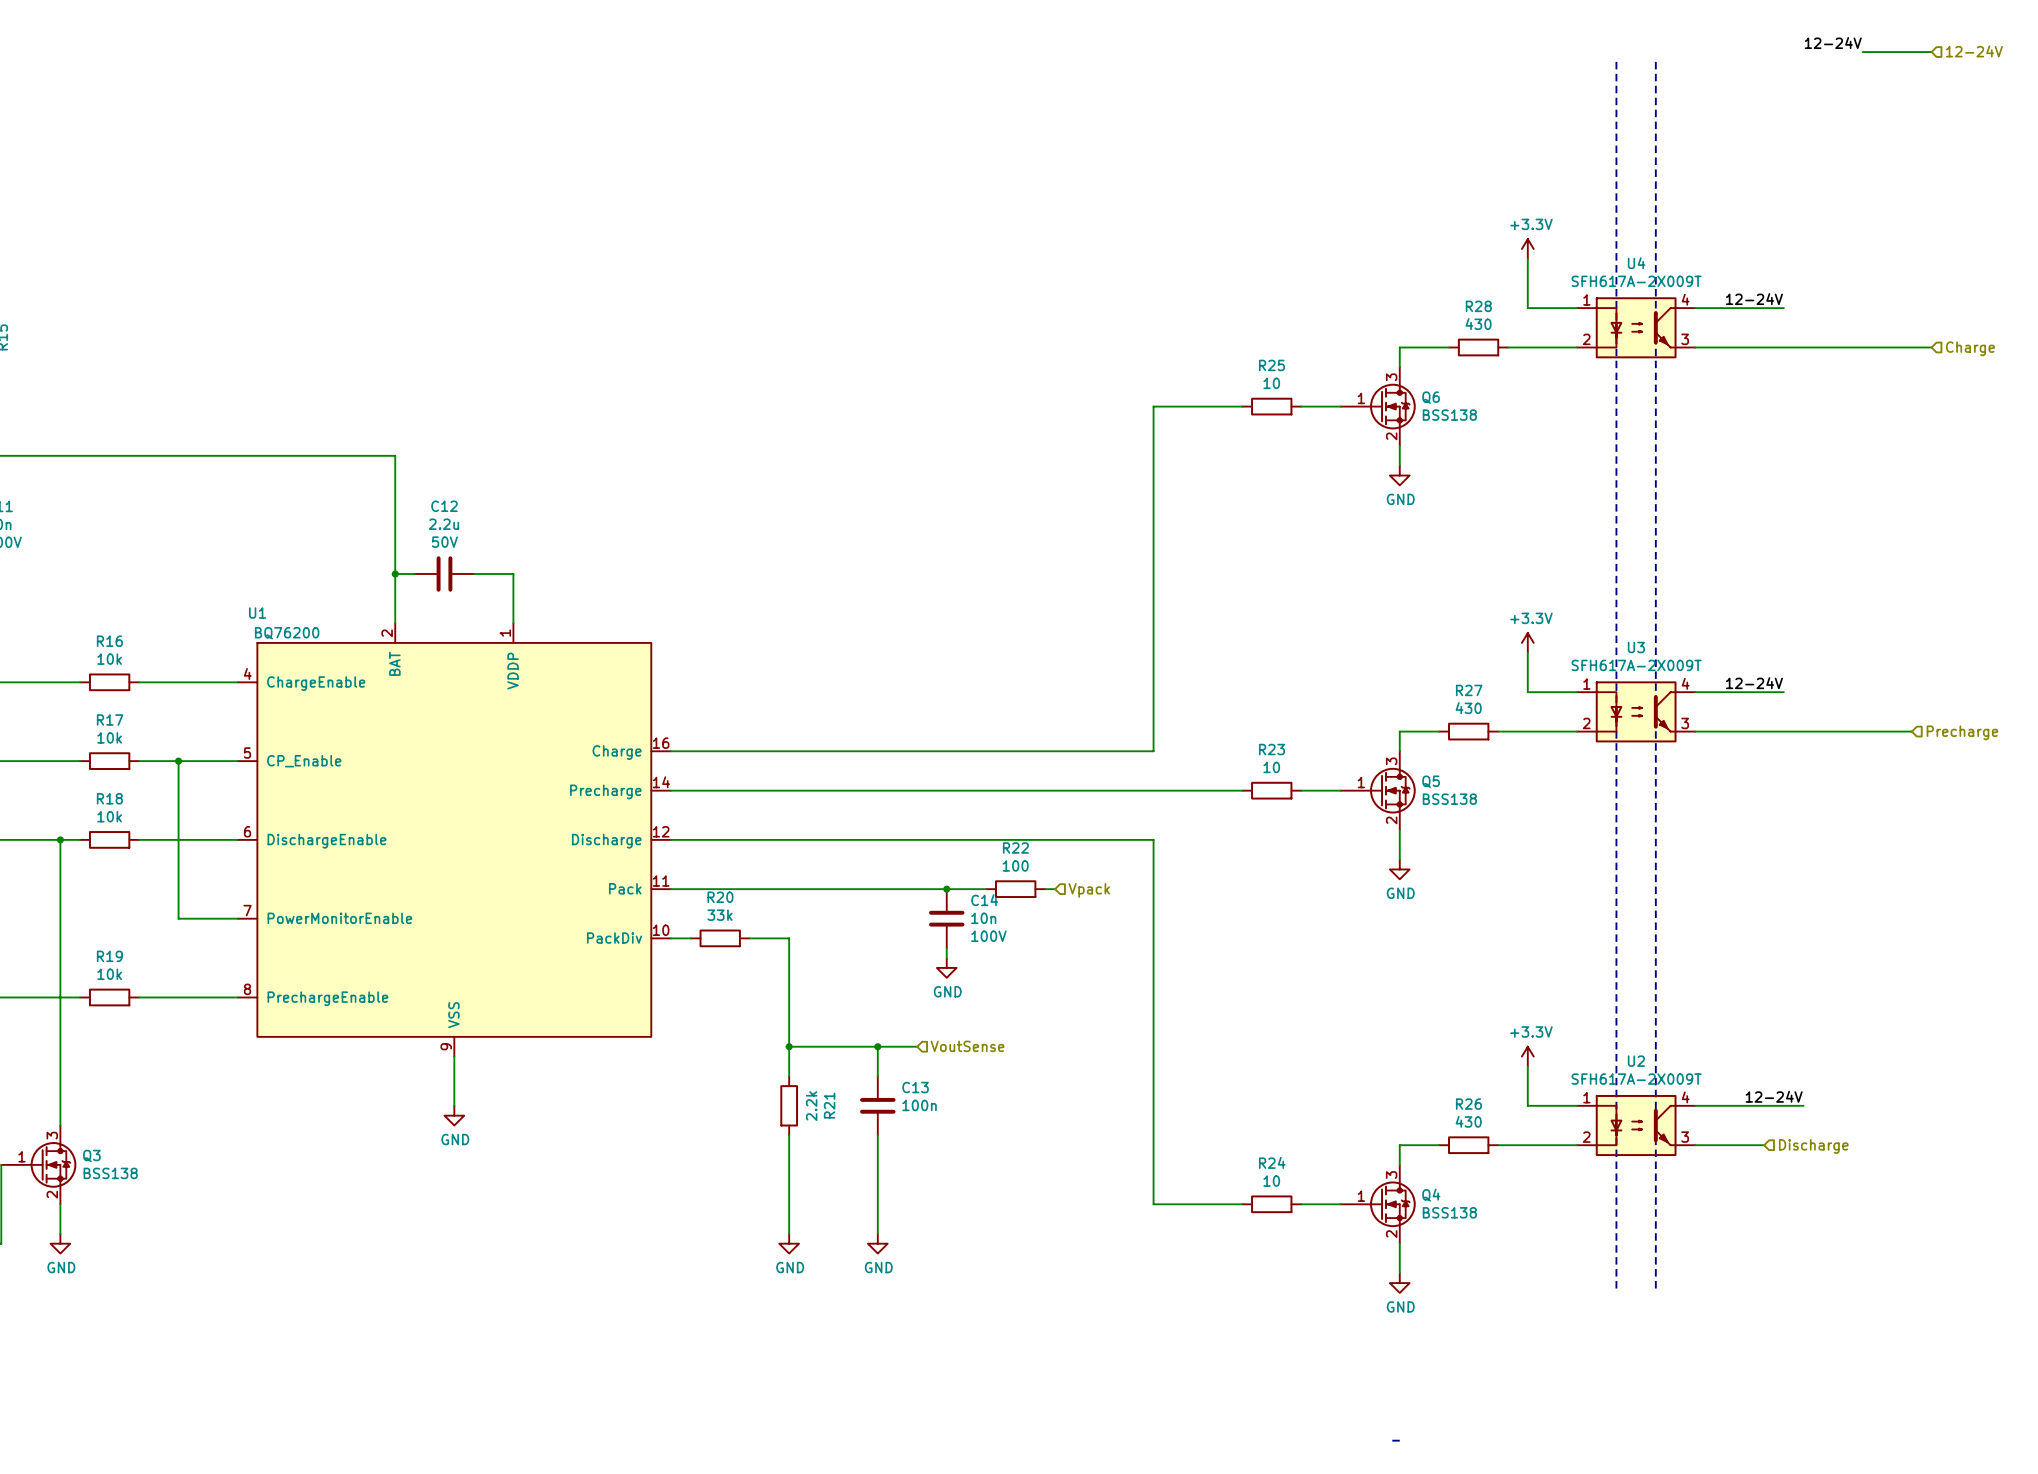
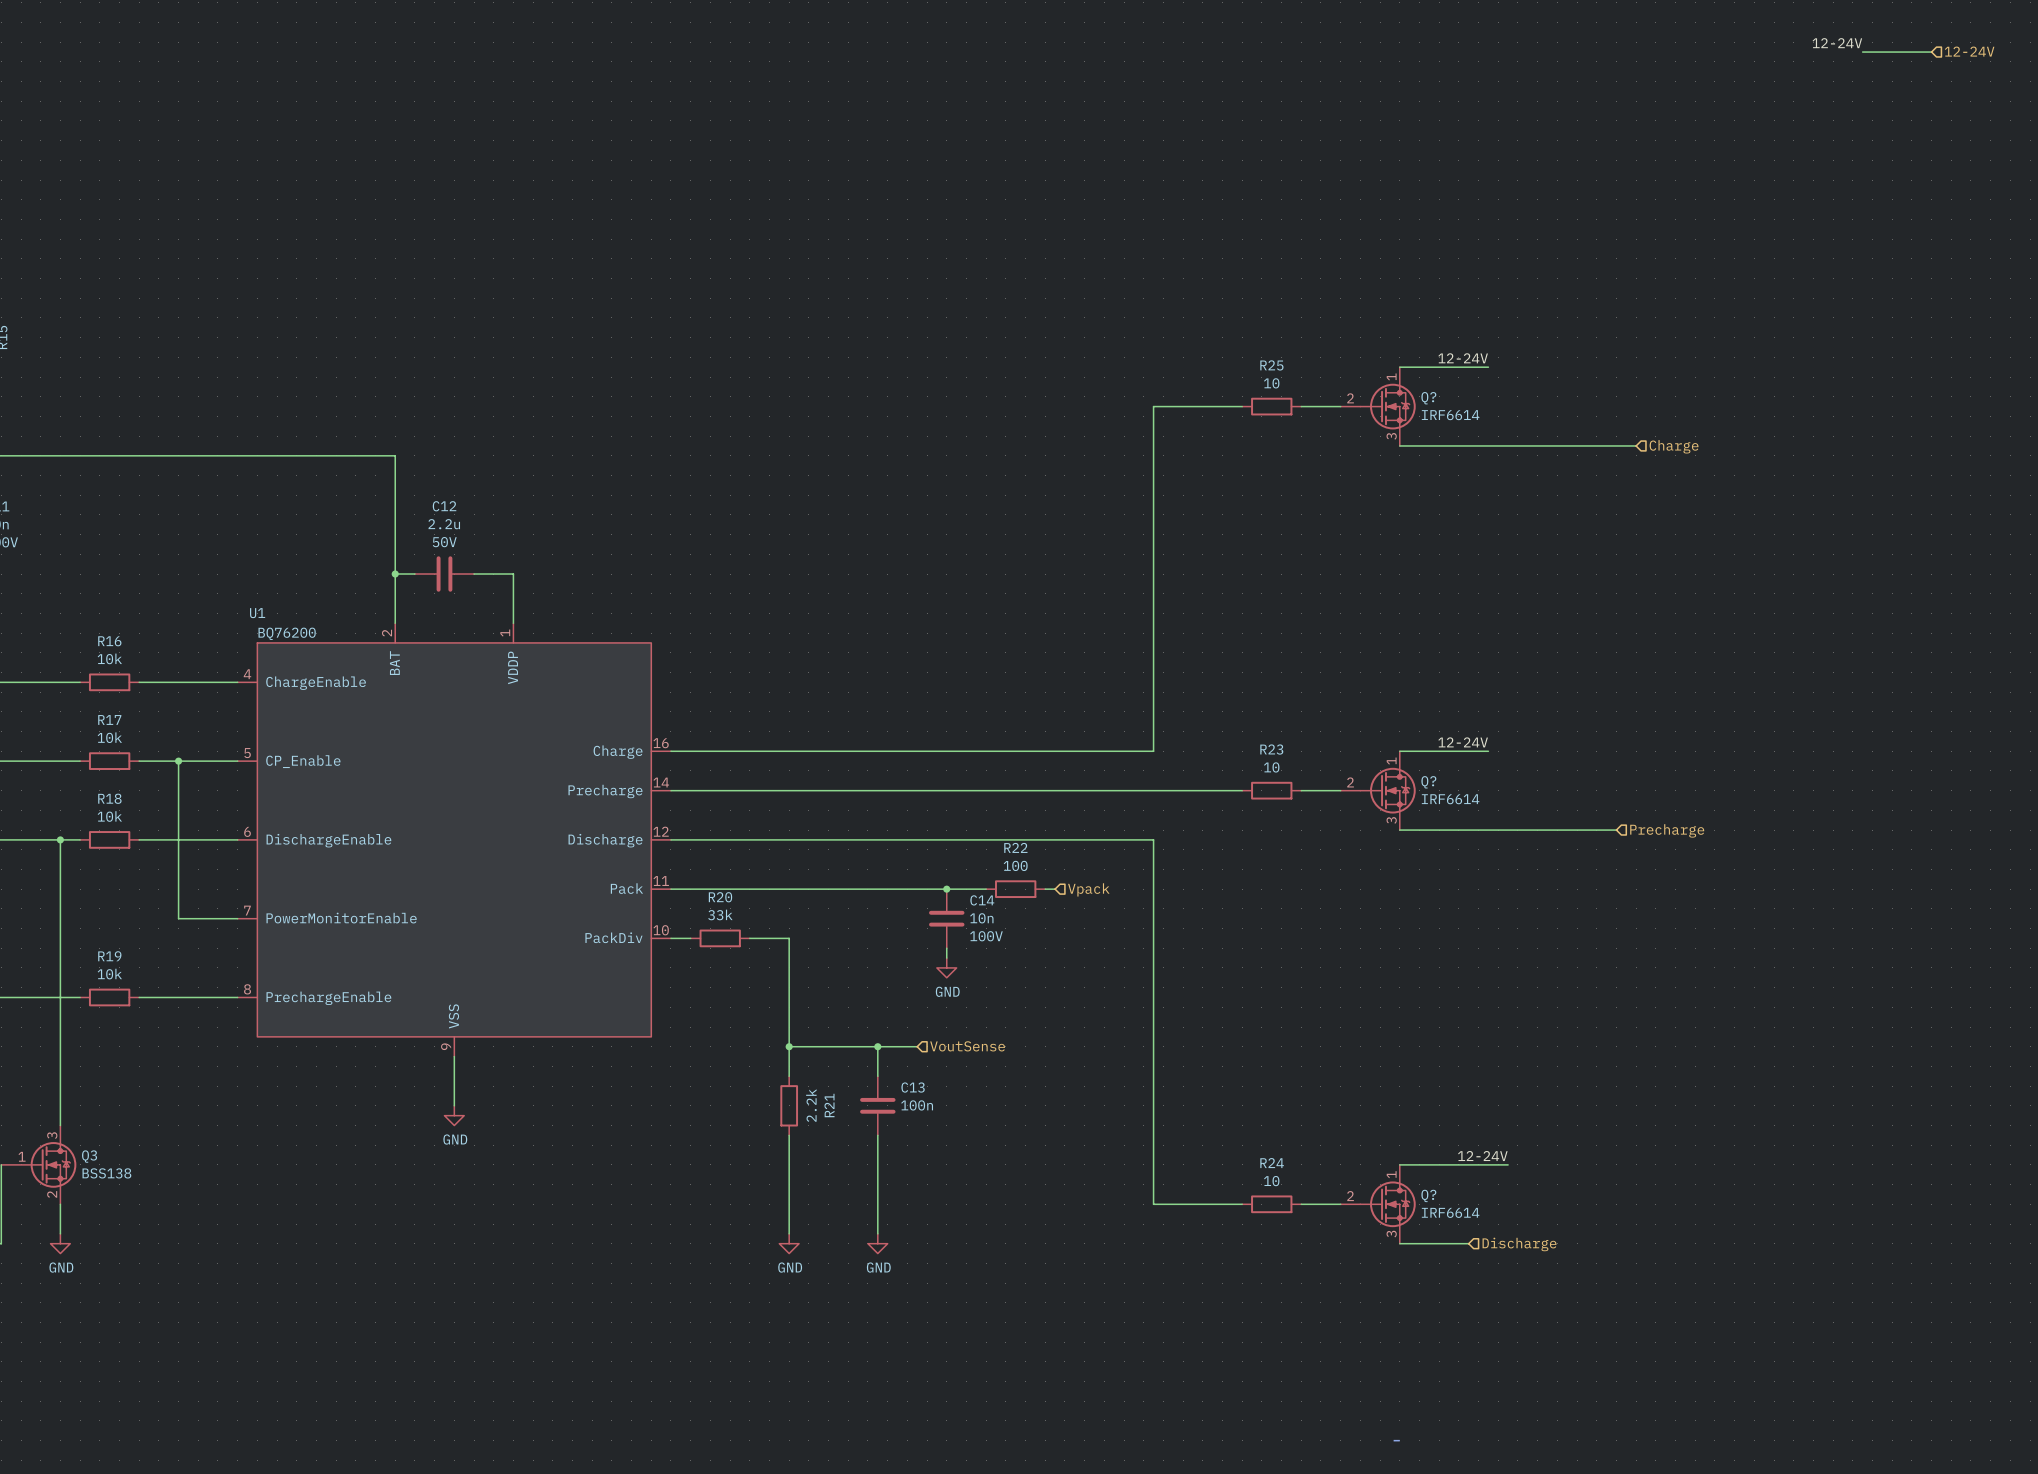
line: (1616, 61) (1616, 1292) -> none
line: (1655, 61) (1655, 1292) -> none
power symbol: +3.3V (1527, 249) -> none
wire: (1527, 258) (1527, 308) (1577, 308) -> none
label: 12-24V (1754, 299) -> none
wire: (1695, 308) (1783, 308) -> none
U4: SFH617A-2X009T (1636, 327) -> none
wire: (1449, 347) (1399, 347) (1399, 367) -> (1488, 367) (1399, 367)
R28: 430 (1478, 347) -> none
wire: (1508, 347) (1577, 347) -> none
wire: (1695, 347) (1931, 347) -> none
hierarchical label: Charge (1970, 348) -> none
label: none -> 12-24V (1463, 358)
Q6: BSS138 (1378, 406) -> none
Q?: none -> IRF6614 (1378, 406)
wire: (1399, 445) (1399, 465) -> (1399, 445) (1636, 445)
hierarchical label: none -> Charge (1674, 446)
power symbol: GND (1399, 475) -> none
power symbol: +3.3V (1527, 642) -> none
wire: (1527, 652) (1527, 692) (1577, 692) -> none
label: 12-24V (1754, 683) -> none
wire: (1695, 692) (1783, 692) -> none
U3: SFH617A-2X009T (1636, 711) -> none
wire: (1439, 731) (1399, 731) (1399, 751) -> (1488, 751) (1399, 751)
R27: 430 (1468, 731) -> none
wire: (1498, 731) (1577, 731) -> none
wire: (1695, 731) (1911, 731) -> none
hierarchical label: Precharge (1962, 732) -> none
label: none -> 12-24V (1463, 742)
Q5: BSS138 (1378, 790) -> none
Q?: none -> IRF6614 (1378, 790)
wire: (1399, 830) (1399, 859) -> (1399, 830) (1616, 830)
hierarchical label: none -> Precharge (1667, 830)
power symbol: GND (1399, 869) -> none
power symbol: +3.3V (1527, 1056) -> none
wire: (1527, 1066) (1527, 1105) (1577, 1105) -> none
label: 12-24V (1774, 1096) -> none
wire: (1695, 1105) (1803, 1105) -> none
U2: SFH617A-2X009T (1636, 1125) -> none
wire: (1439, 1145) (1399, 1145) (1399, 1164) -> (1508, 1164) (1399, 1164)
R26: 430 (1468, 1145) -> none
wire: (1498, 1145) (1577, 1145) -> none
wire: (1695, 1145) (1764, 1145) -> none
hierarchical label: Discharge (1813, 1146) -> none
label: none -> 12-24V (1482, 1156)
Q4: BSS138 (1378, 1204) -> none
Q?: none -> IRF6614 (1378, 1204)
wire: (1399, 1243) (1399, 1273) -> (1399, 1243) (1468, 1243)
hierarchical label: none -> Discharge (1519, 1244)
power symbol: GND (1399, 1283) -> none

